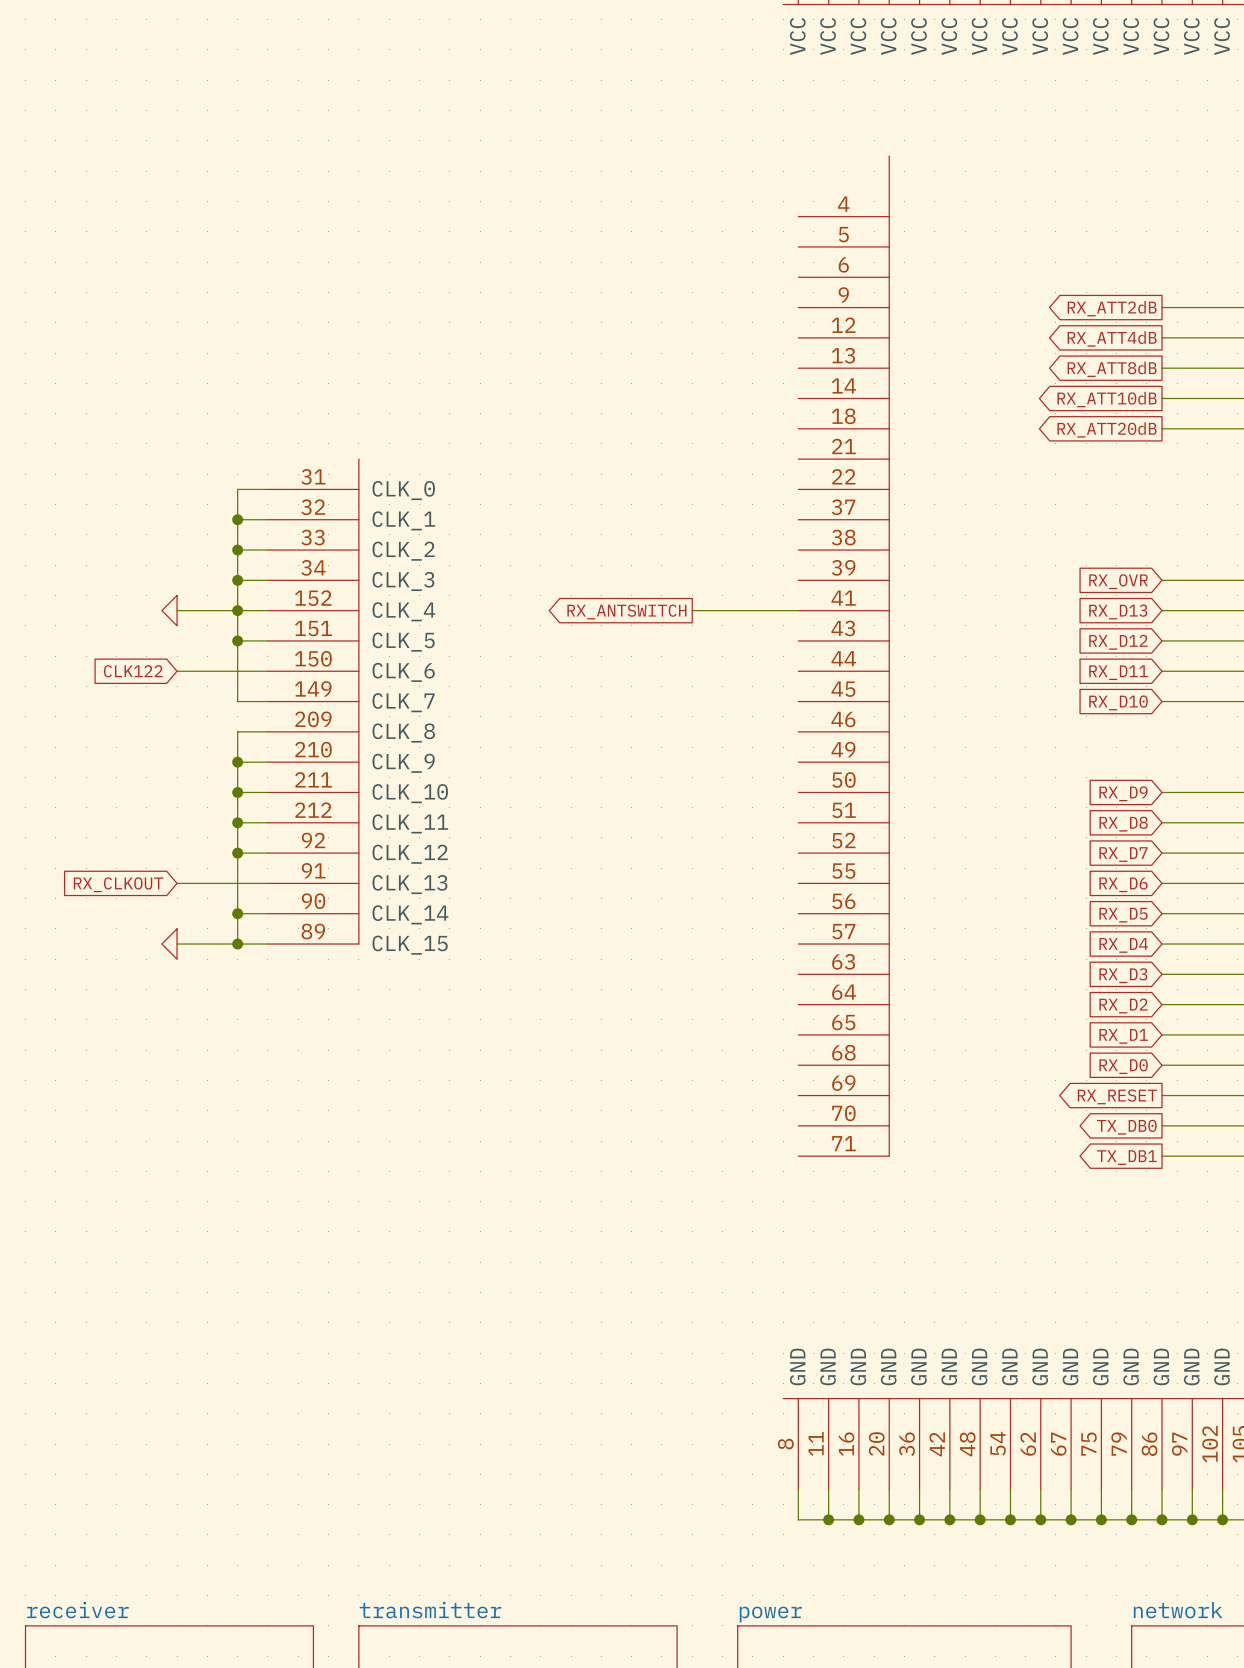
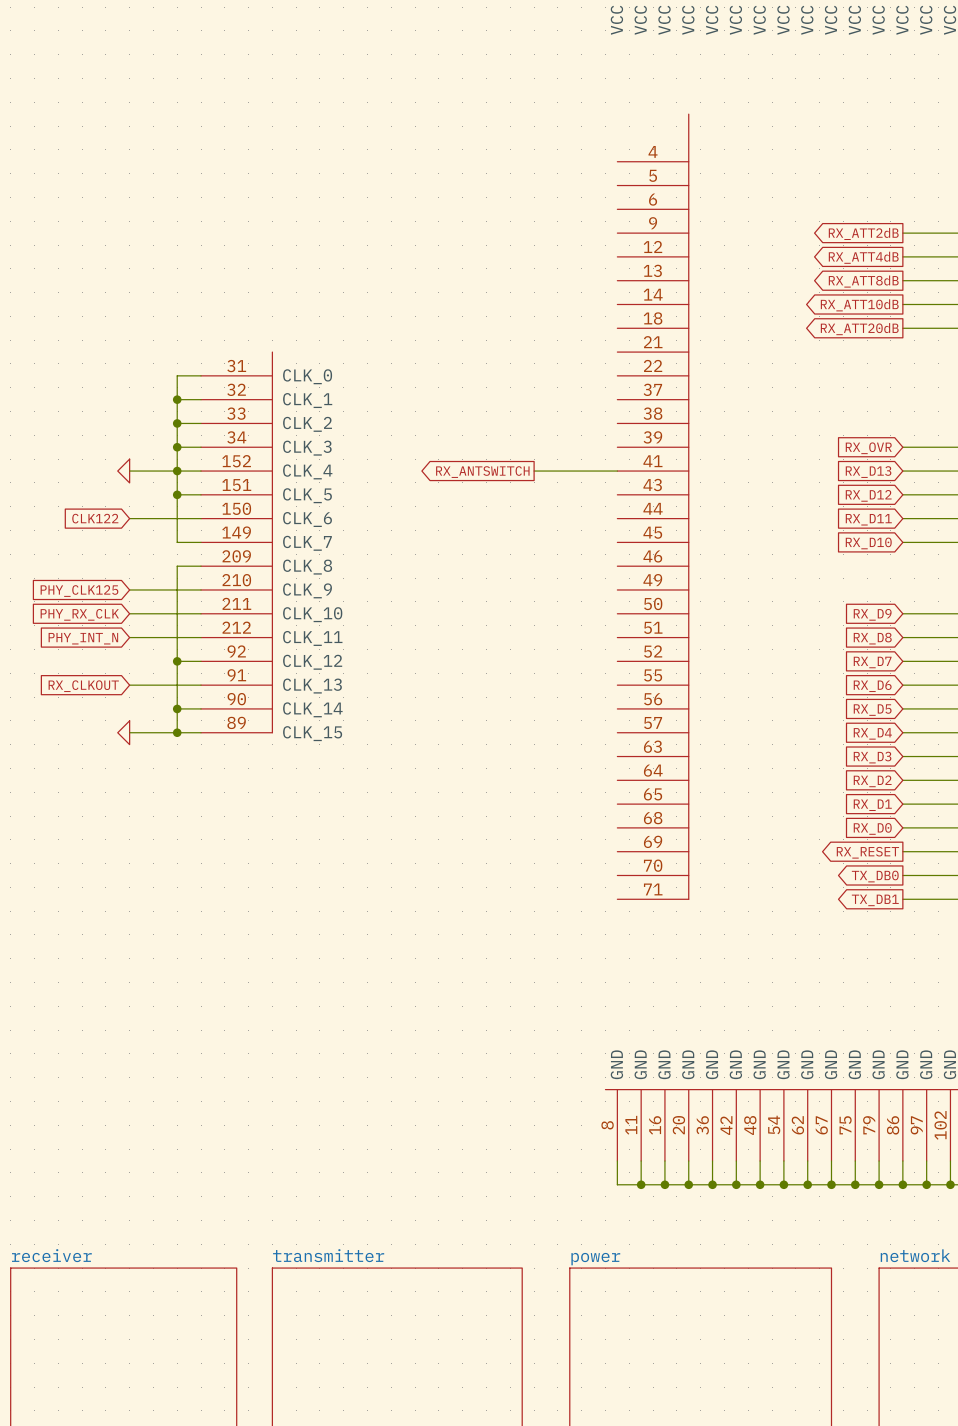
wire: none -> (129, 589) (177, 589)
junction: (237, 762) -> none
global label: none -> PHY_CLK125 (79, 591)
wire: none -> (129, 613) (177, 613)
junction: (237, 792) -> none
global label: none -> PHY_RX_CLK (79, 614)
wire: none -> (129, 637) (177, 637)
junction: (237, 822) -> none
global label: none -> PHY_INT_N (83, 638)

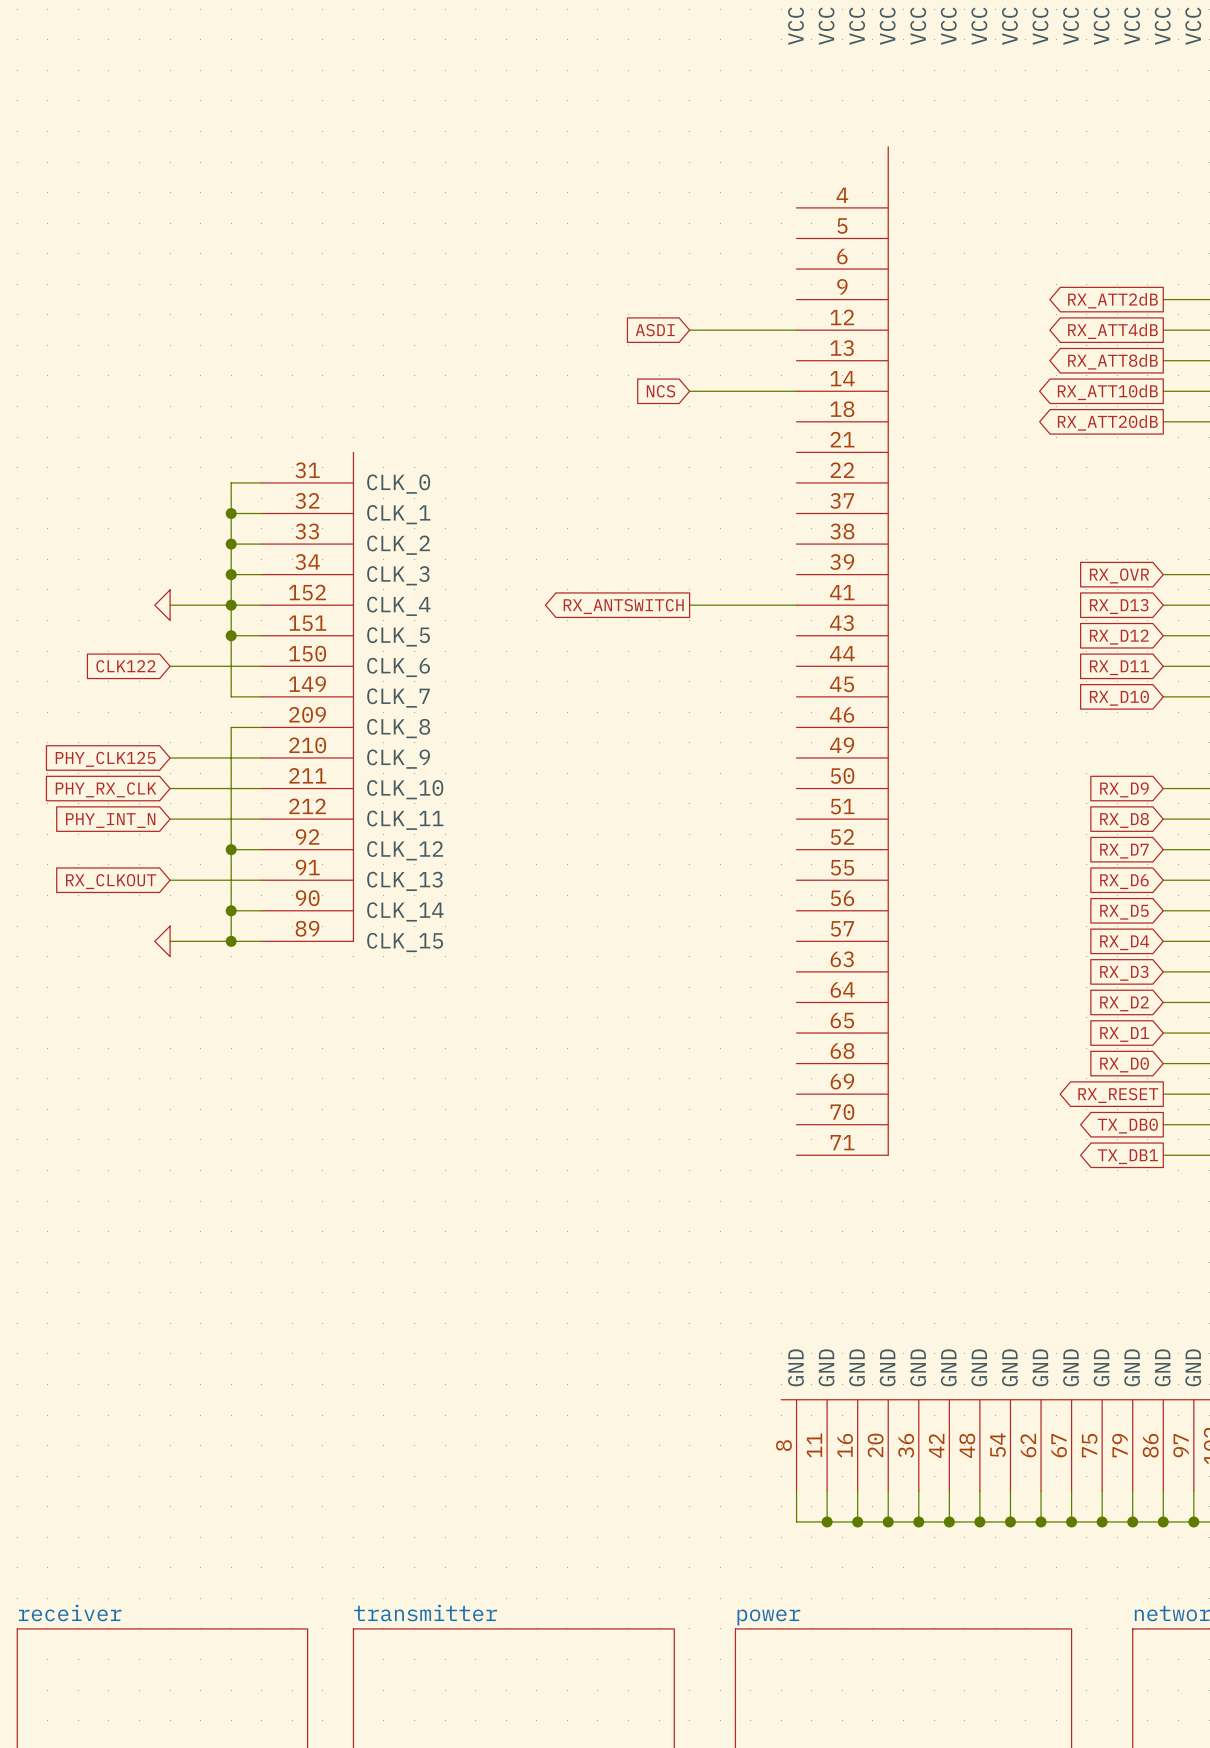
global label: none -> ASDI (655, 330)
wire: none -> (689, 330) (796, 330)
global label: none -> NCS (661, 391)
wire: none -> (689, 391) (796, 391)

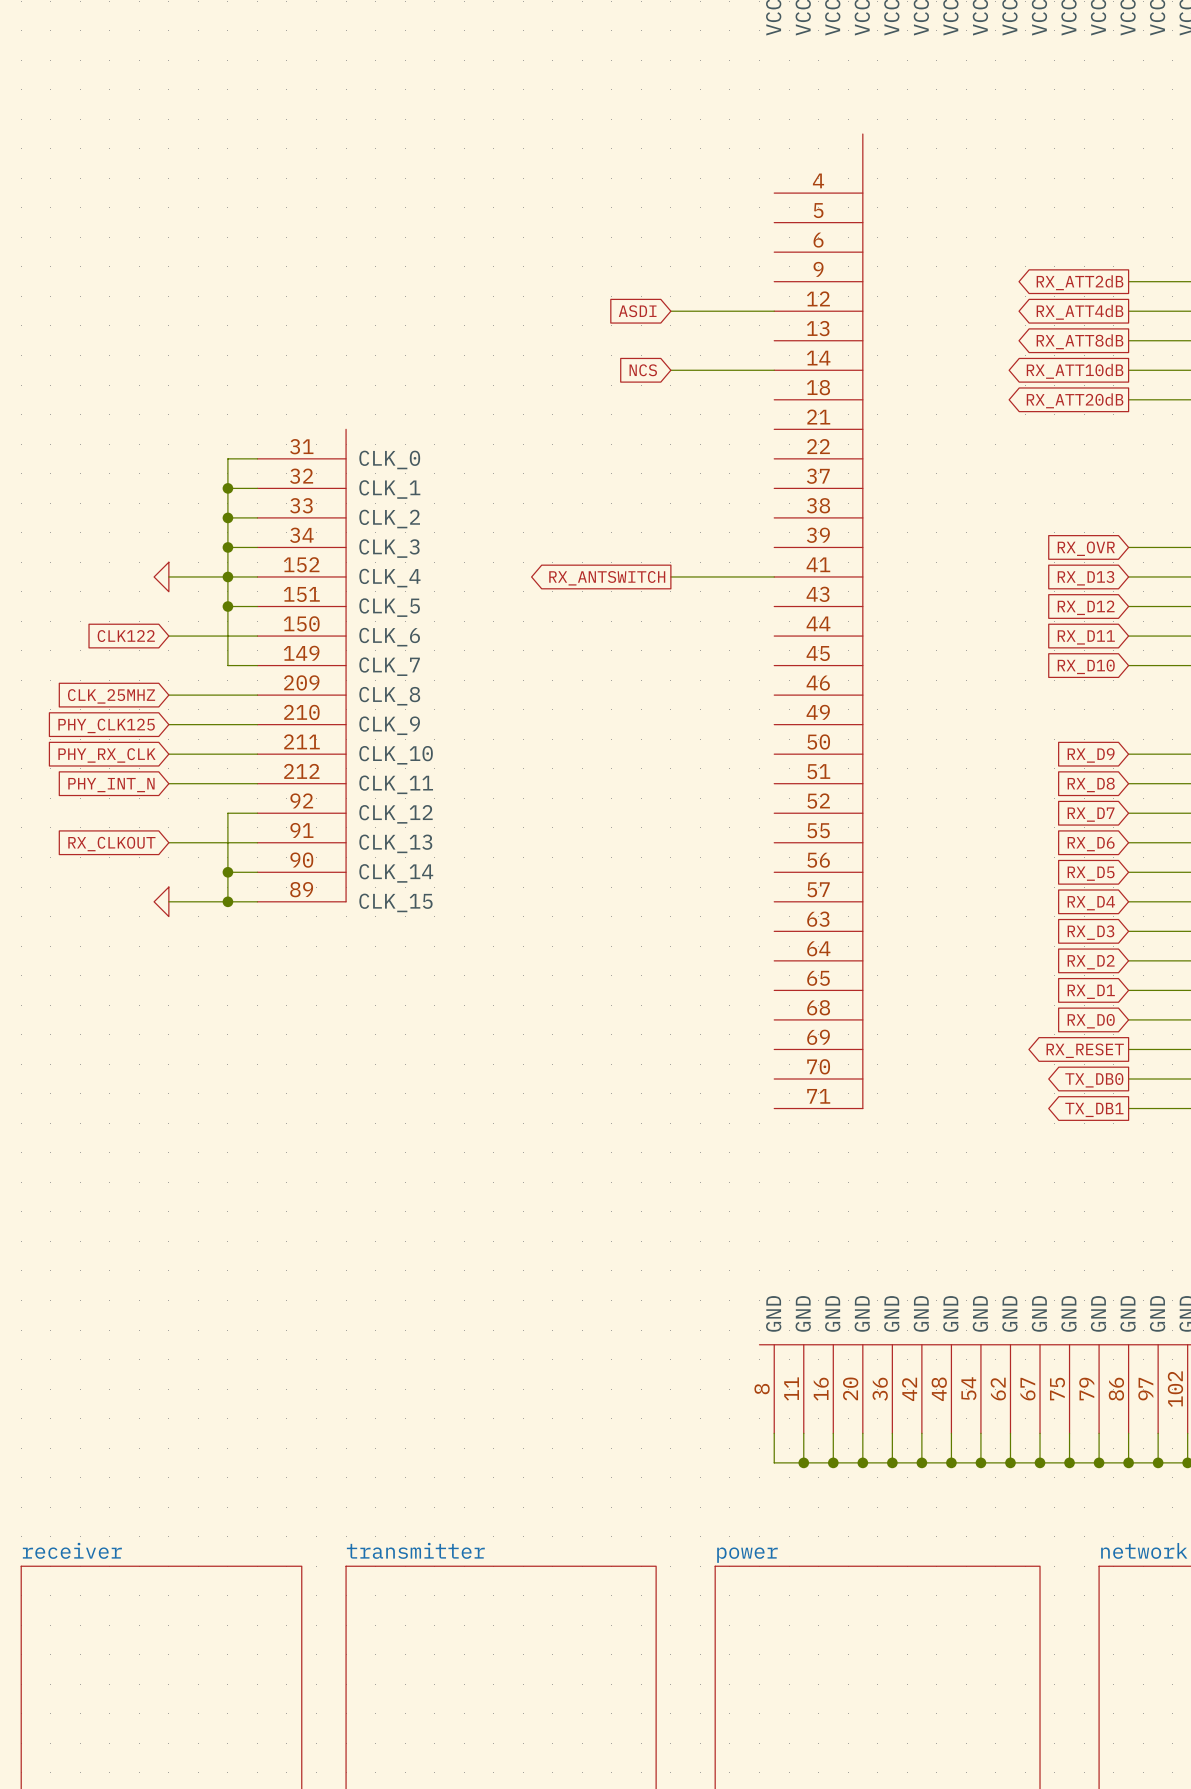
wire: (231, 727) (231, 849) -> (227, 695) (168, 695)
global label: none -> CLK_25MHZ (111, 696)
junction: (231, 849) -> none

